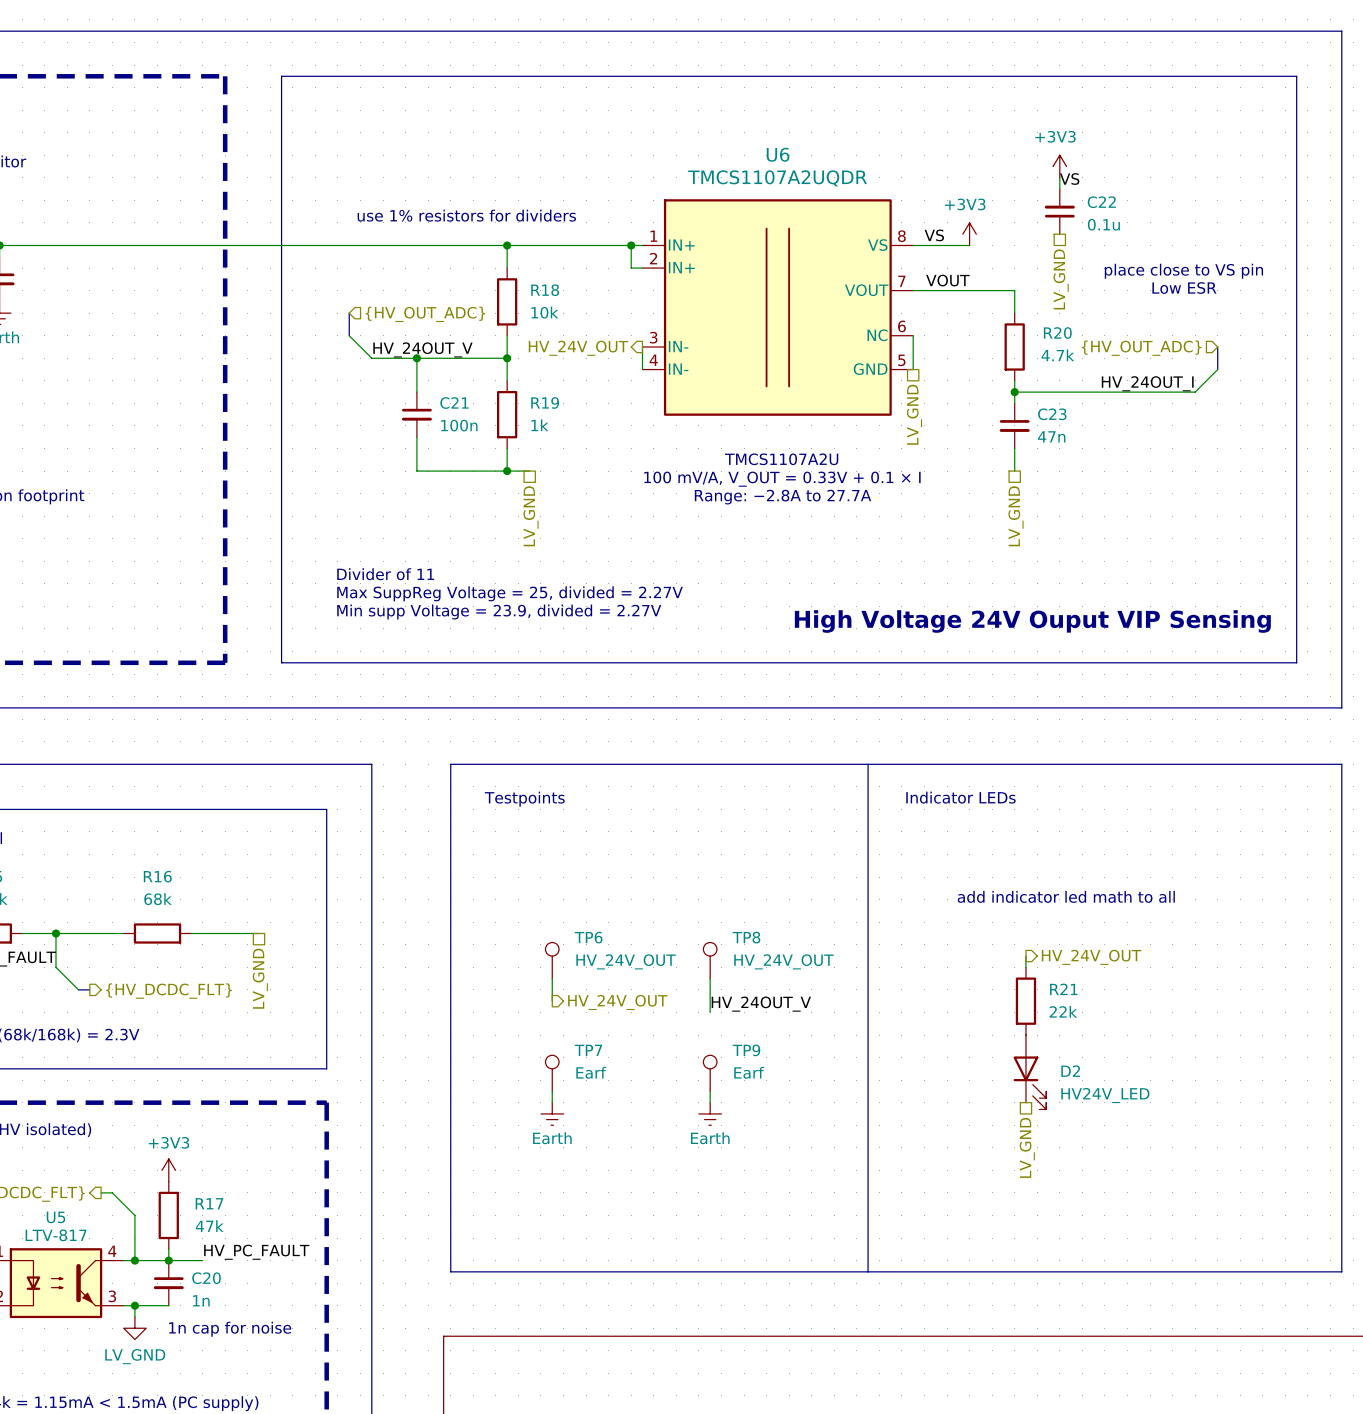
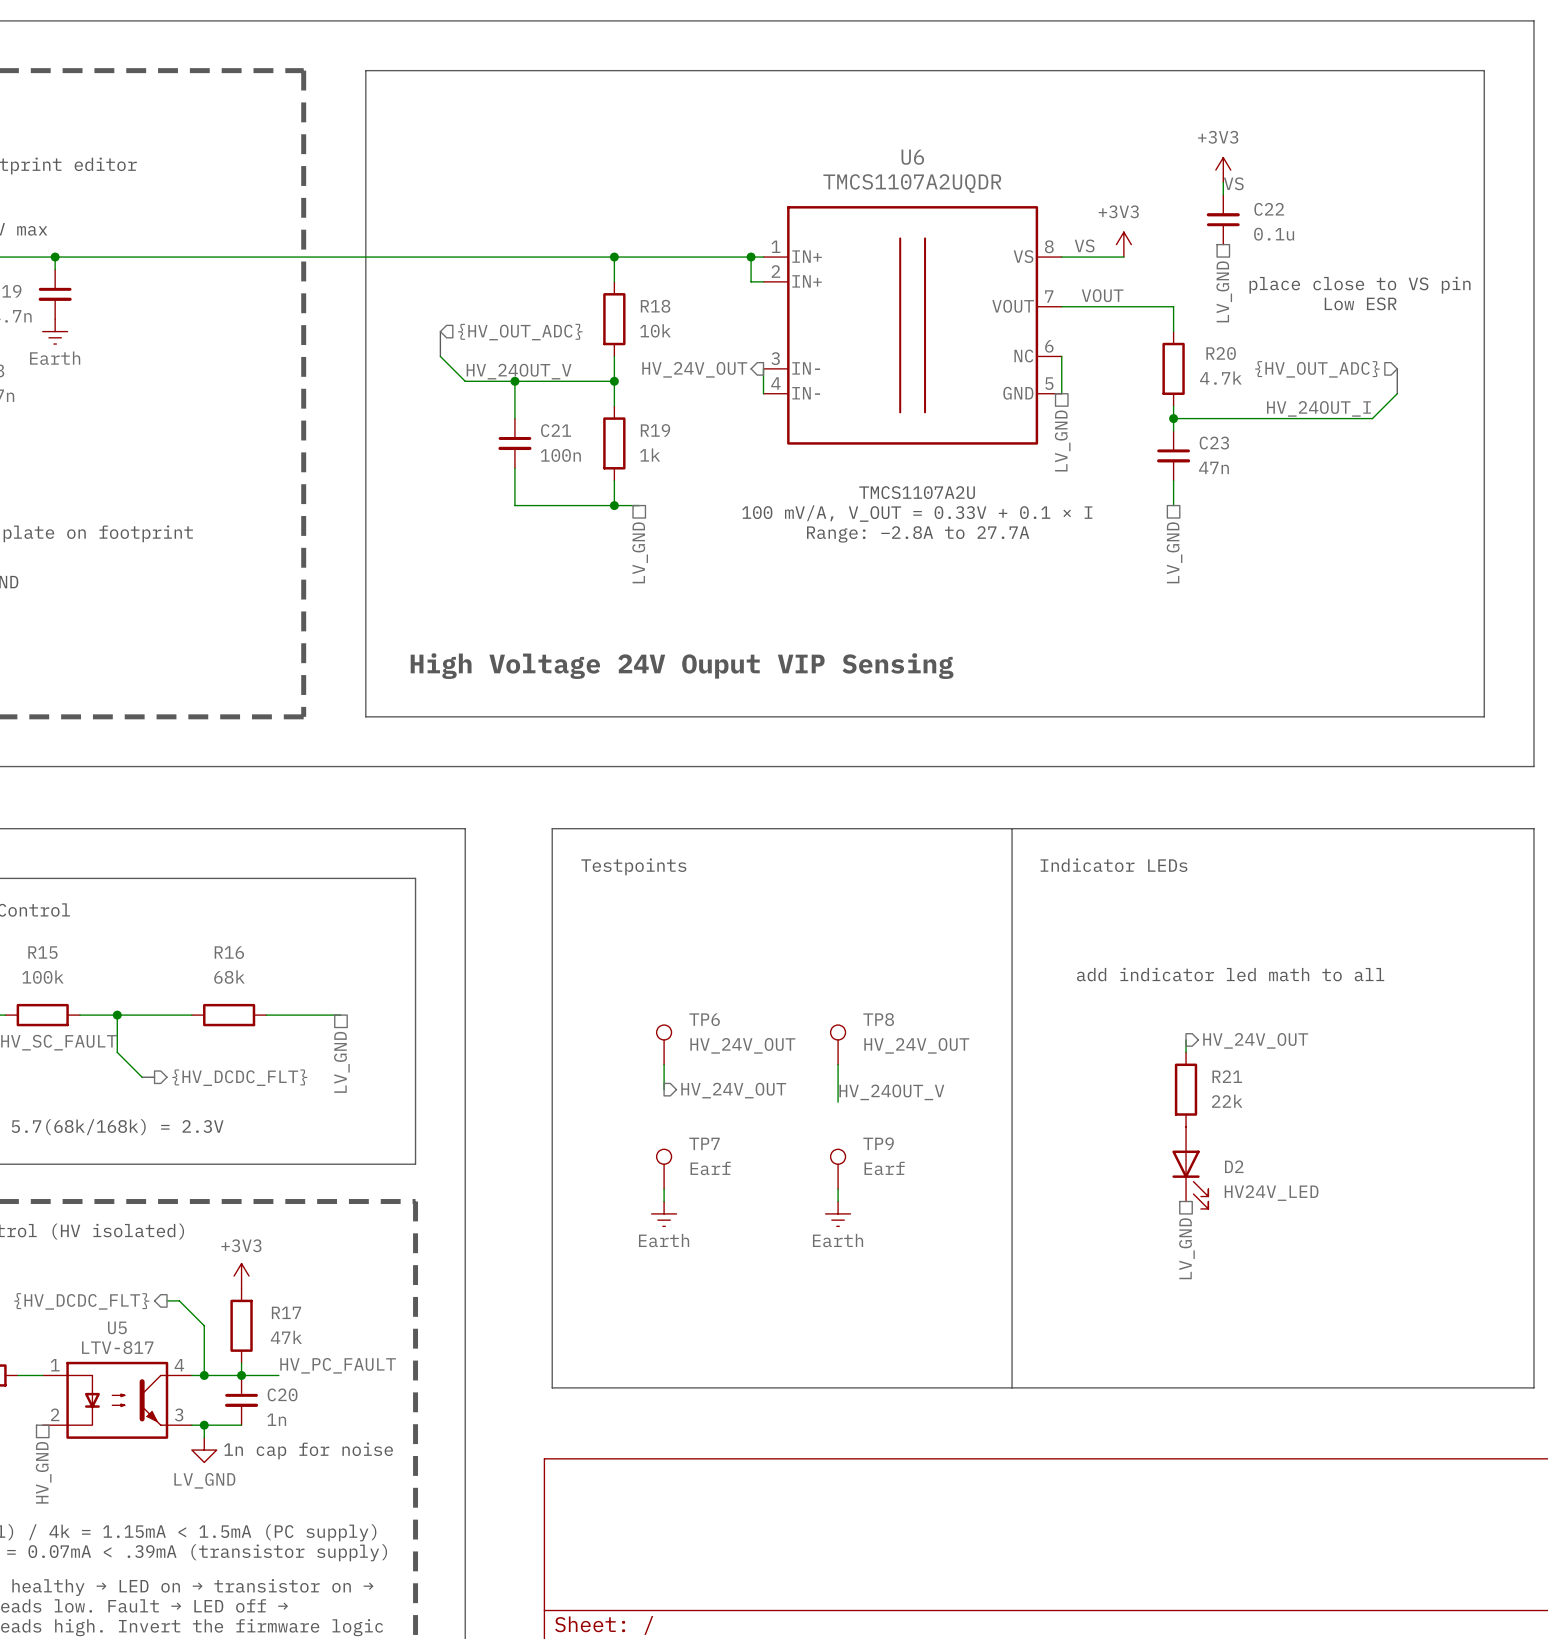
text: use 1% resistors for dividers (466, 215) -> none
text: Divider of 11 (385, 574) -> none
text: Max SuppReg Voltage = 25, divided = 2.27V (510, 593) -> none
text: Min supp Voltage = 23.9, divided = 2.27V (499, 612) -> none
text: none -> High Voltage 24V Ouput VIP Sensing (682, 666)
text: High Voltage 24V Ouput VIP Sensing (1032, 621) -> none

